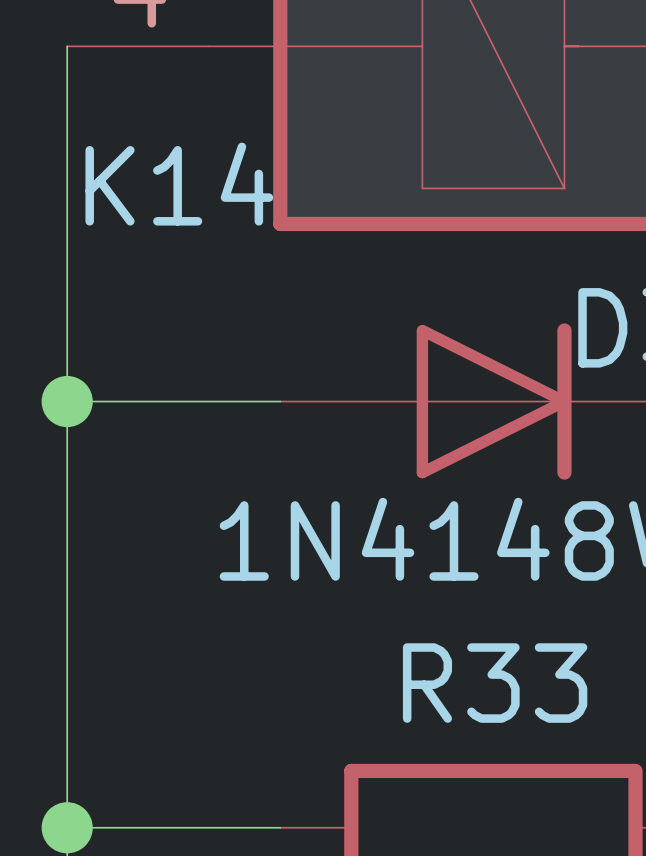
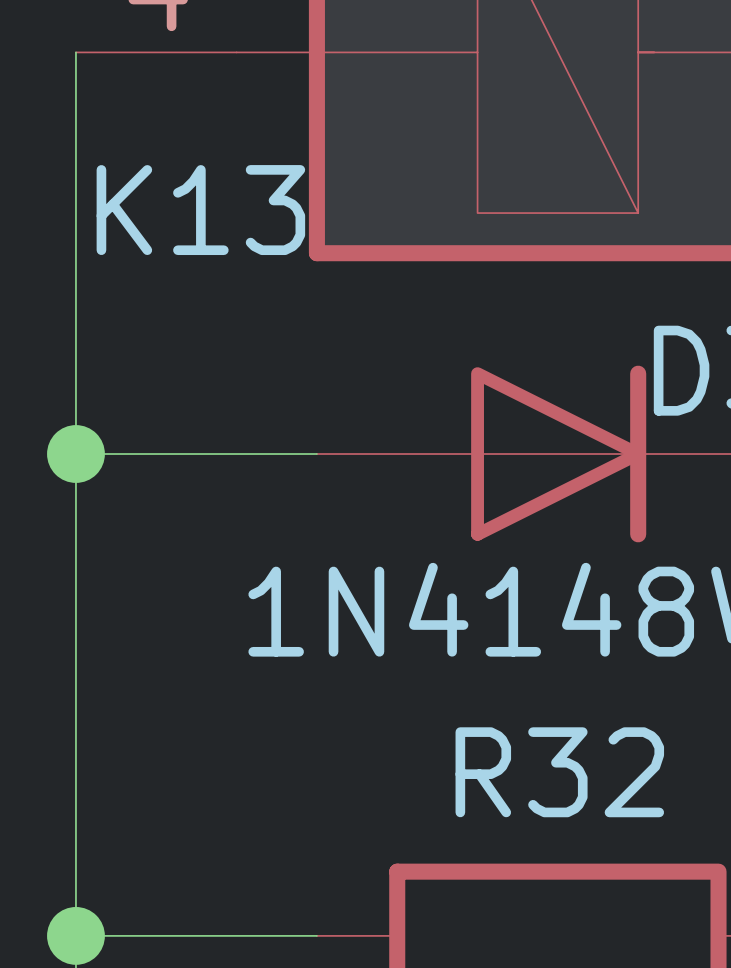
K14 name: K14 (179, 184) -> K13 (200, 210)
R33 name: R33 (495, 683) -> R32 (559, 772)

